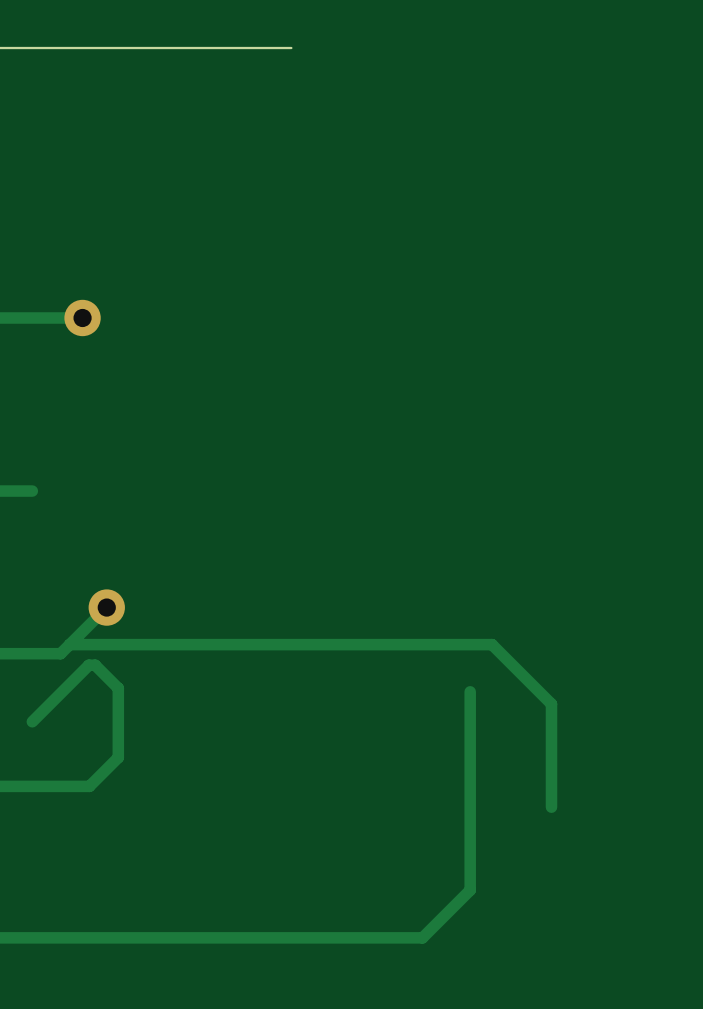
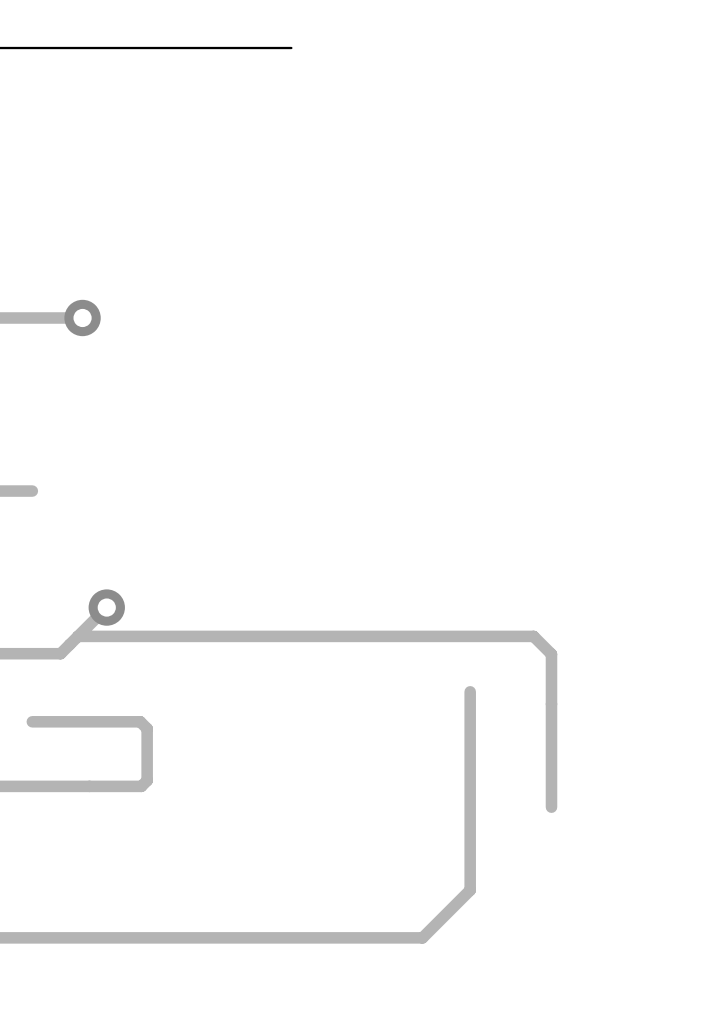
track: (69, 644) (492, 644) (551, 704) -> (77, 636) (533, 636) (551, 654) (551, 704)
track: (32, 721) (88, 665) (95, 665) (118, 688) (118, 757) (89, 786) -> (32, 721) (140, 721) (147, 728) (147, 780) (141, 786) (89, 786)

